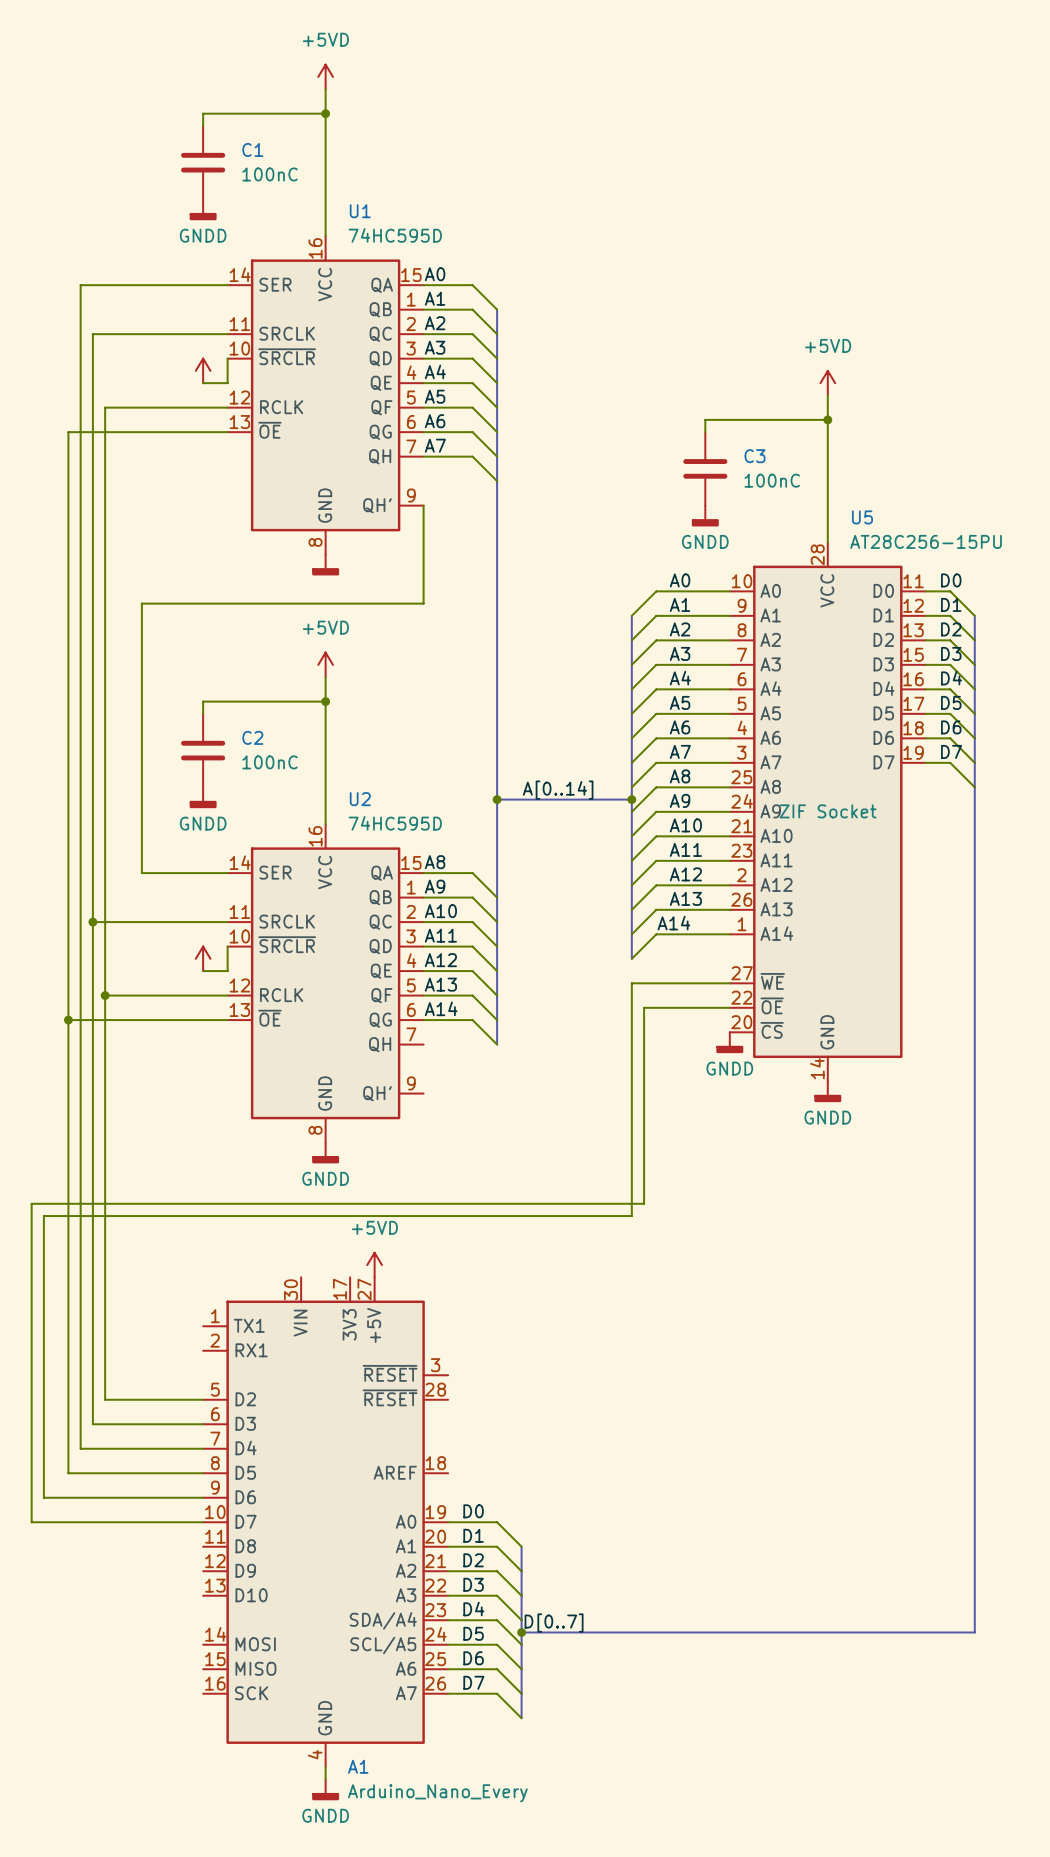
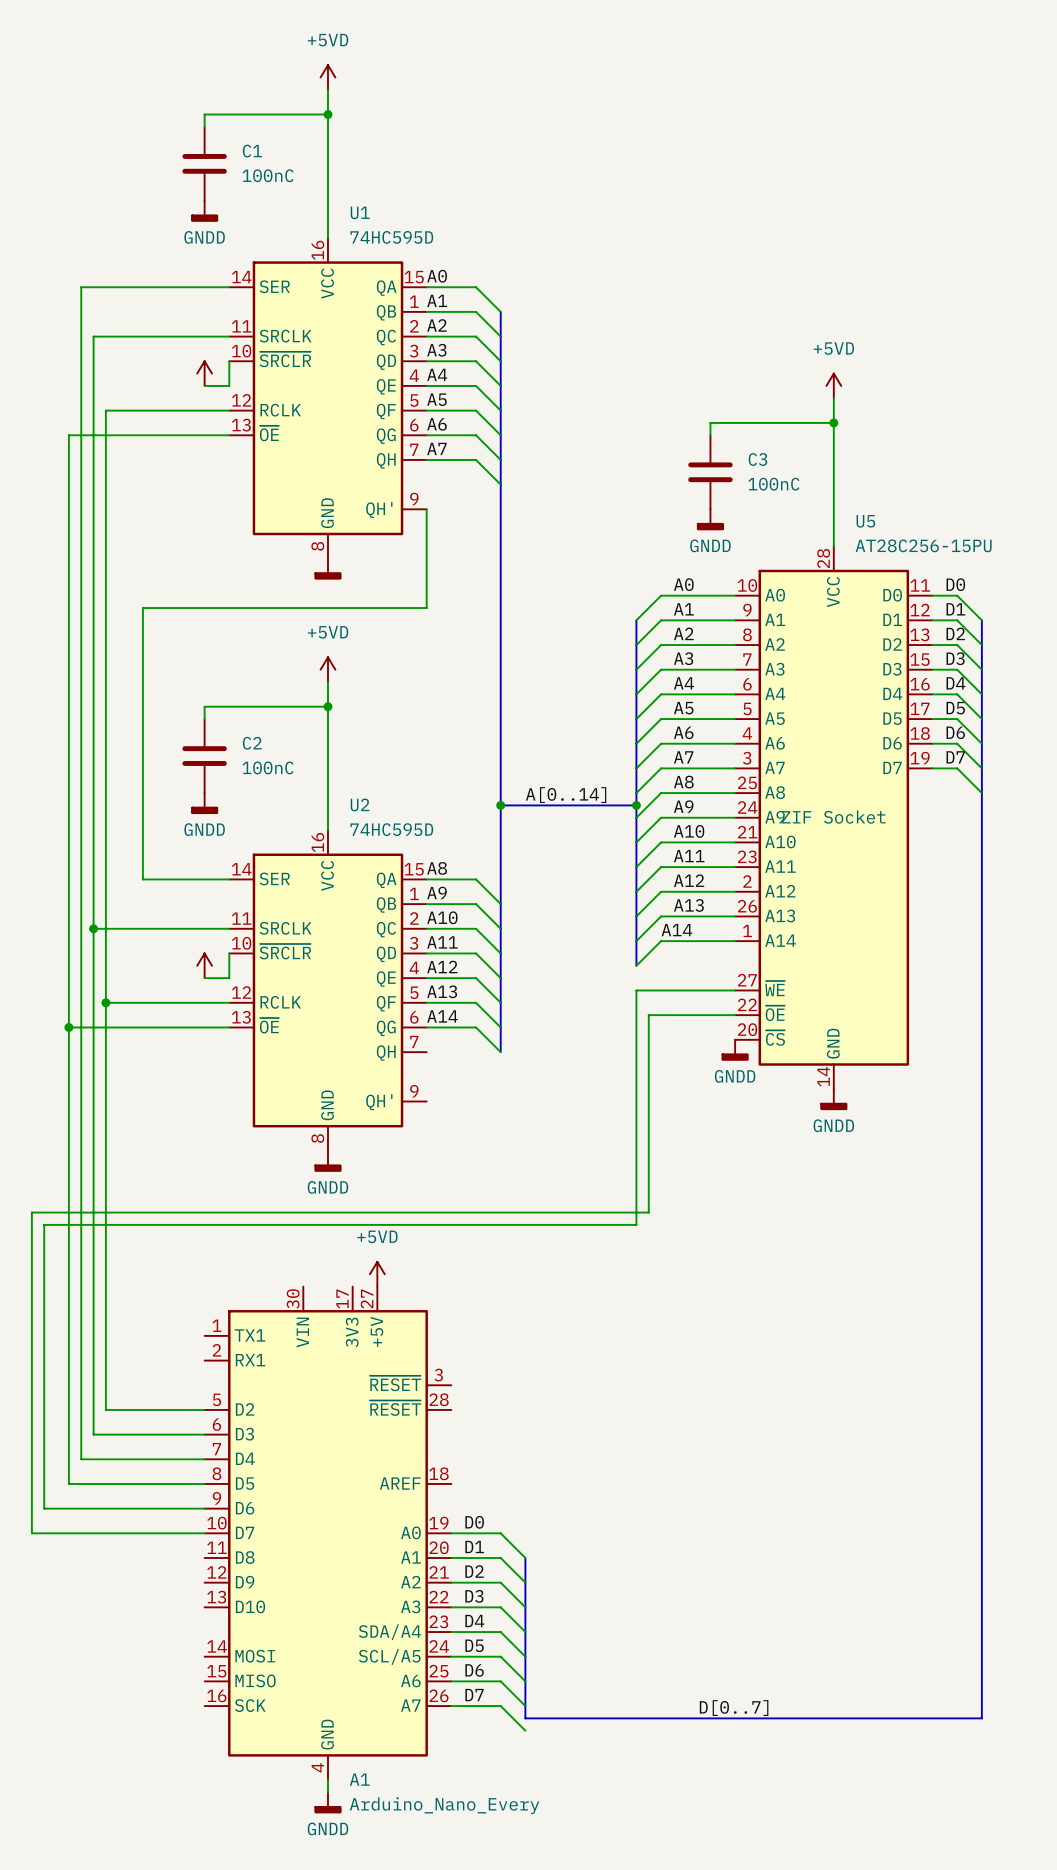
label position: D[0..7] (554, 1623) -> D[0..7] (734, 1708)
bus: (521, 1632) (974, 1632) -> (525, 1718) (981, 1718) (981, 1644)
junction: (521, 1632) -> none
bus: (521, 1705) (521, 1718) -> none

